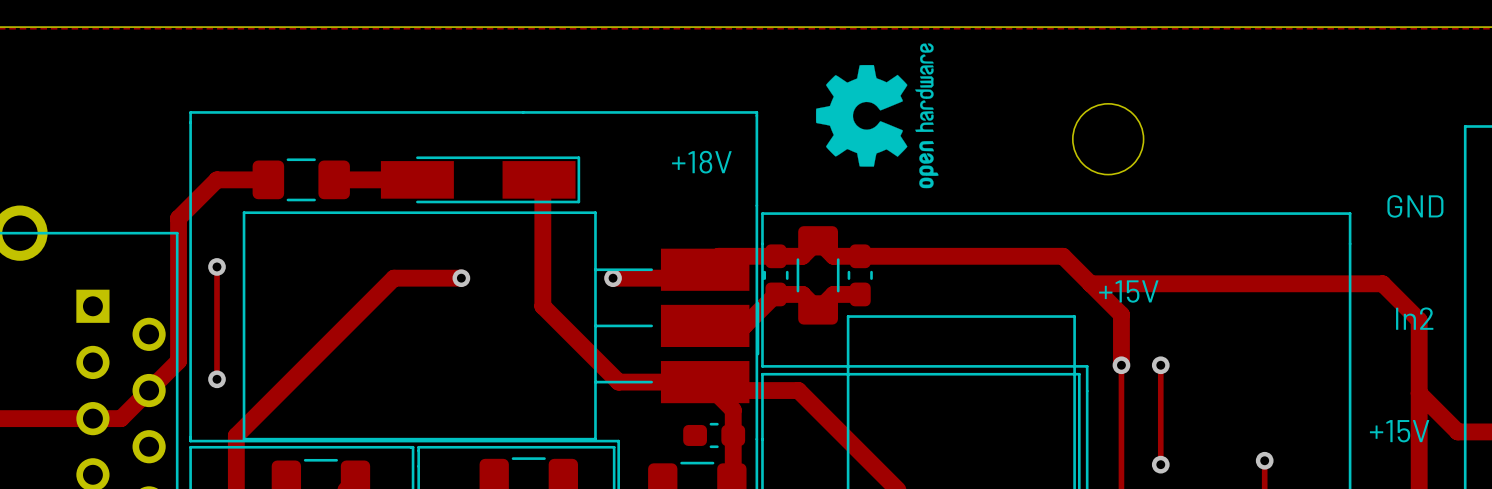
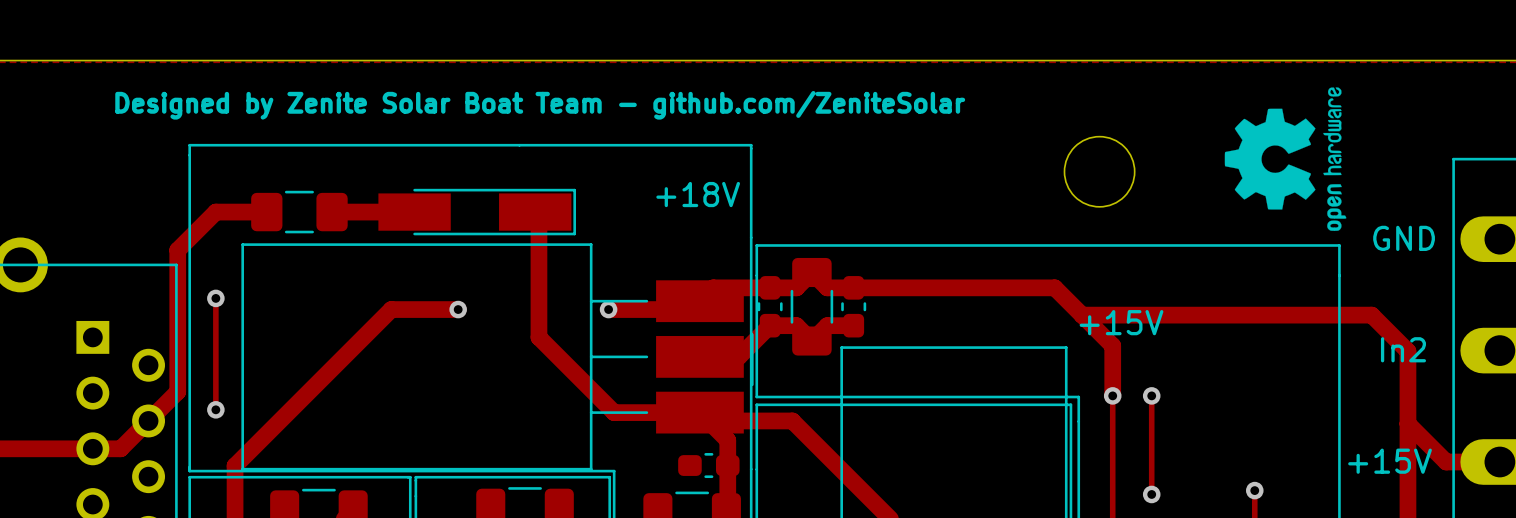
text: none -> Designed by Zenite Solar Boat Team - github.com/ZeniteSolar (540, 105)
drawing position: (877, 115) -> (1285, 159)

